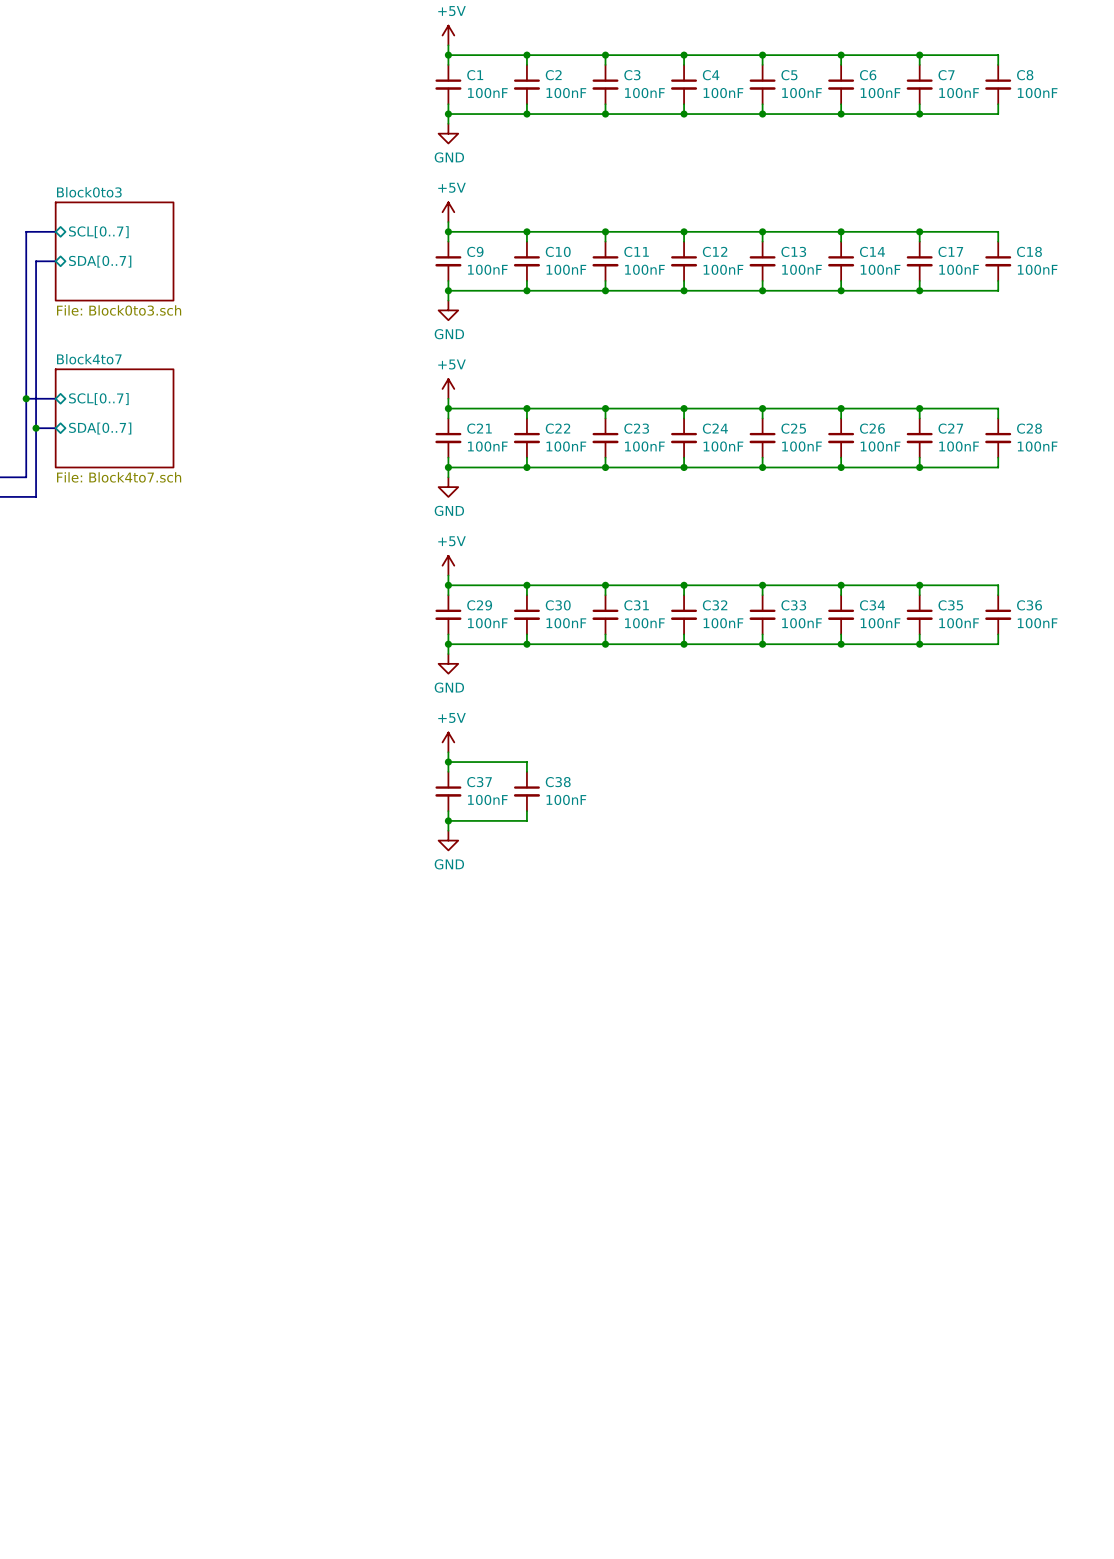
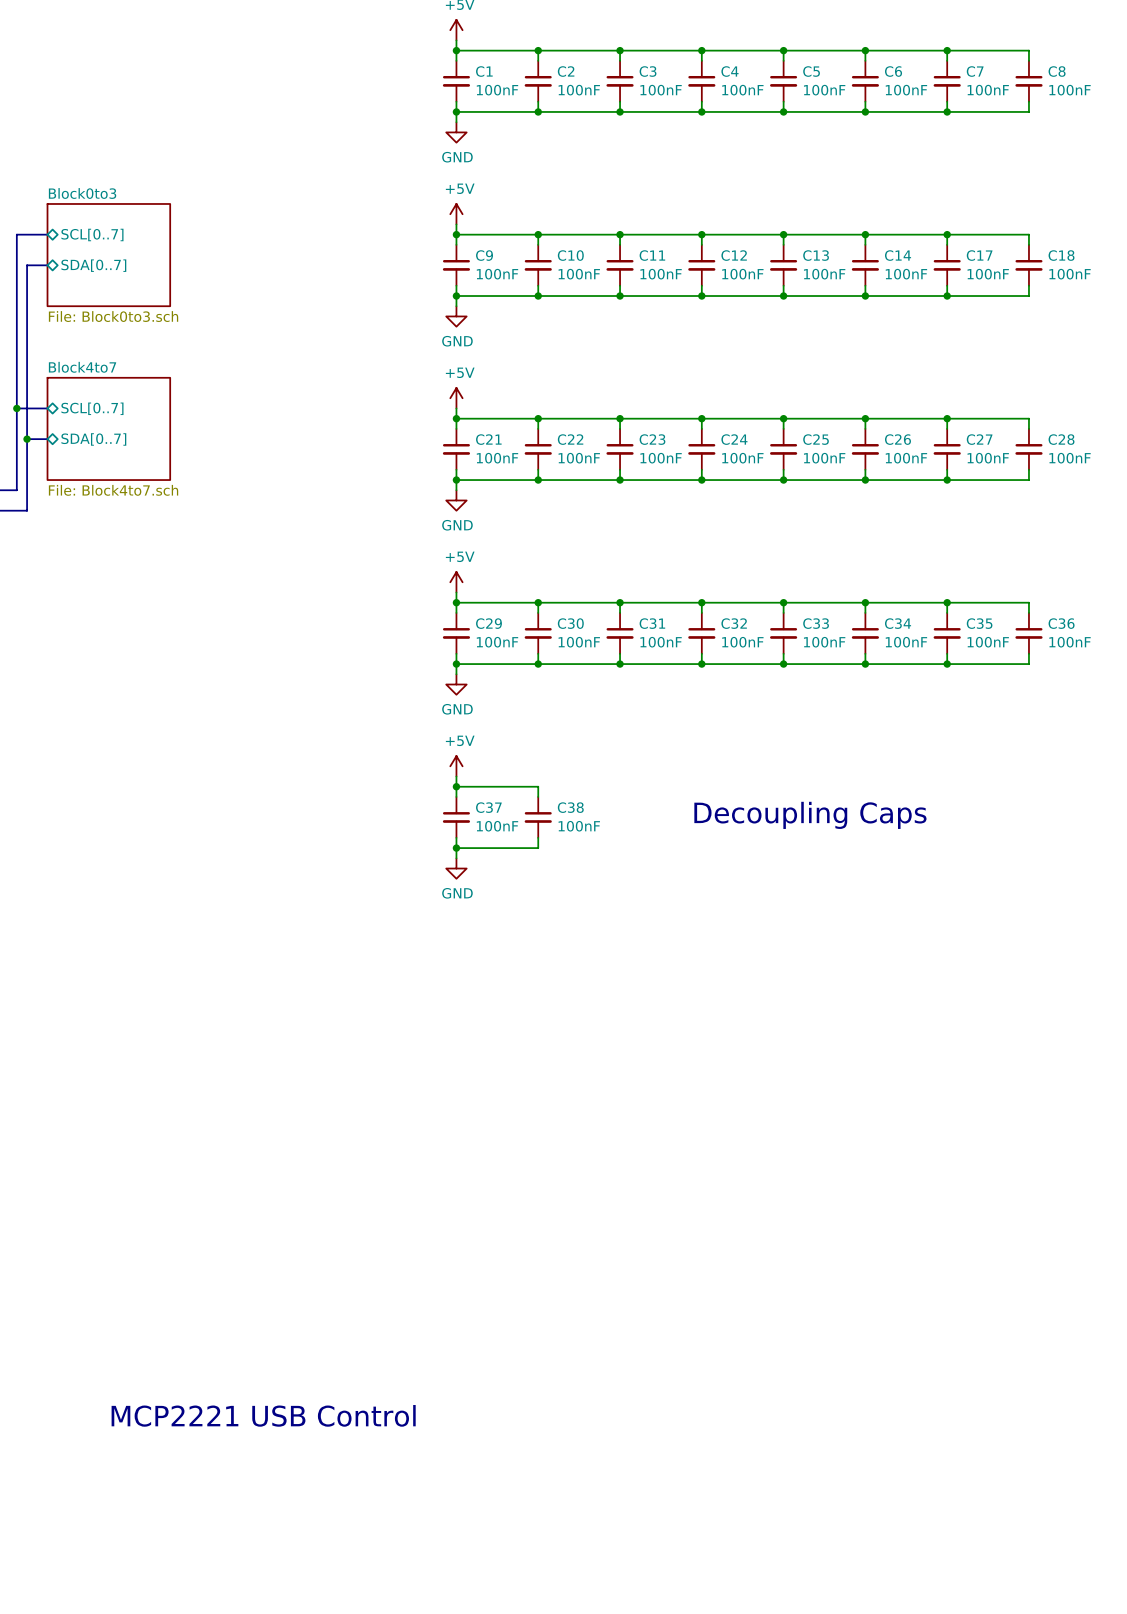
text: none -> Decoupling Caps (810, 815)
text: none -> MCP2221 USB Control (263, 1415)

